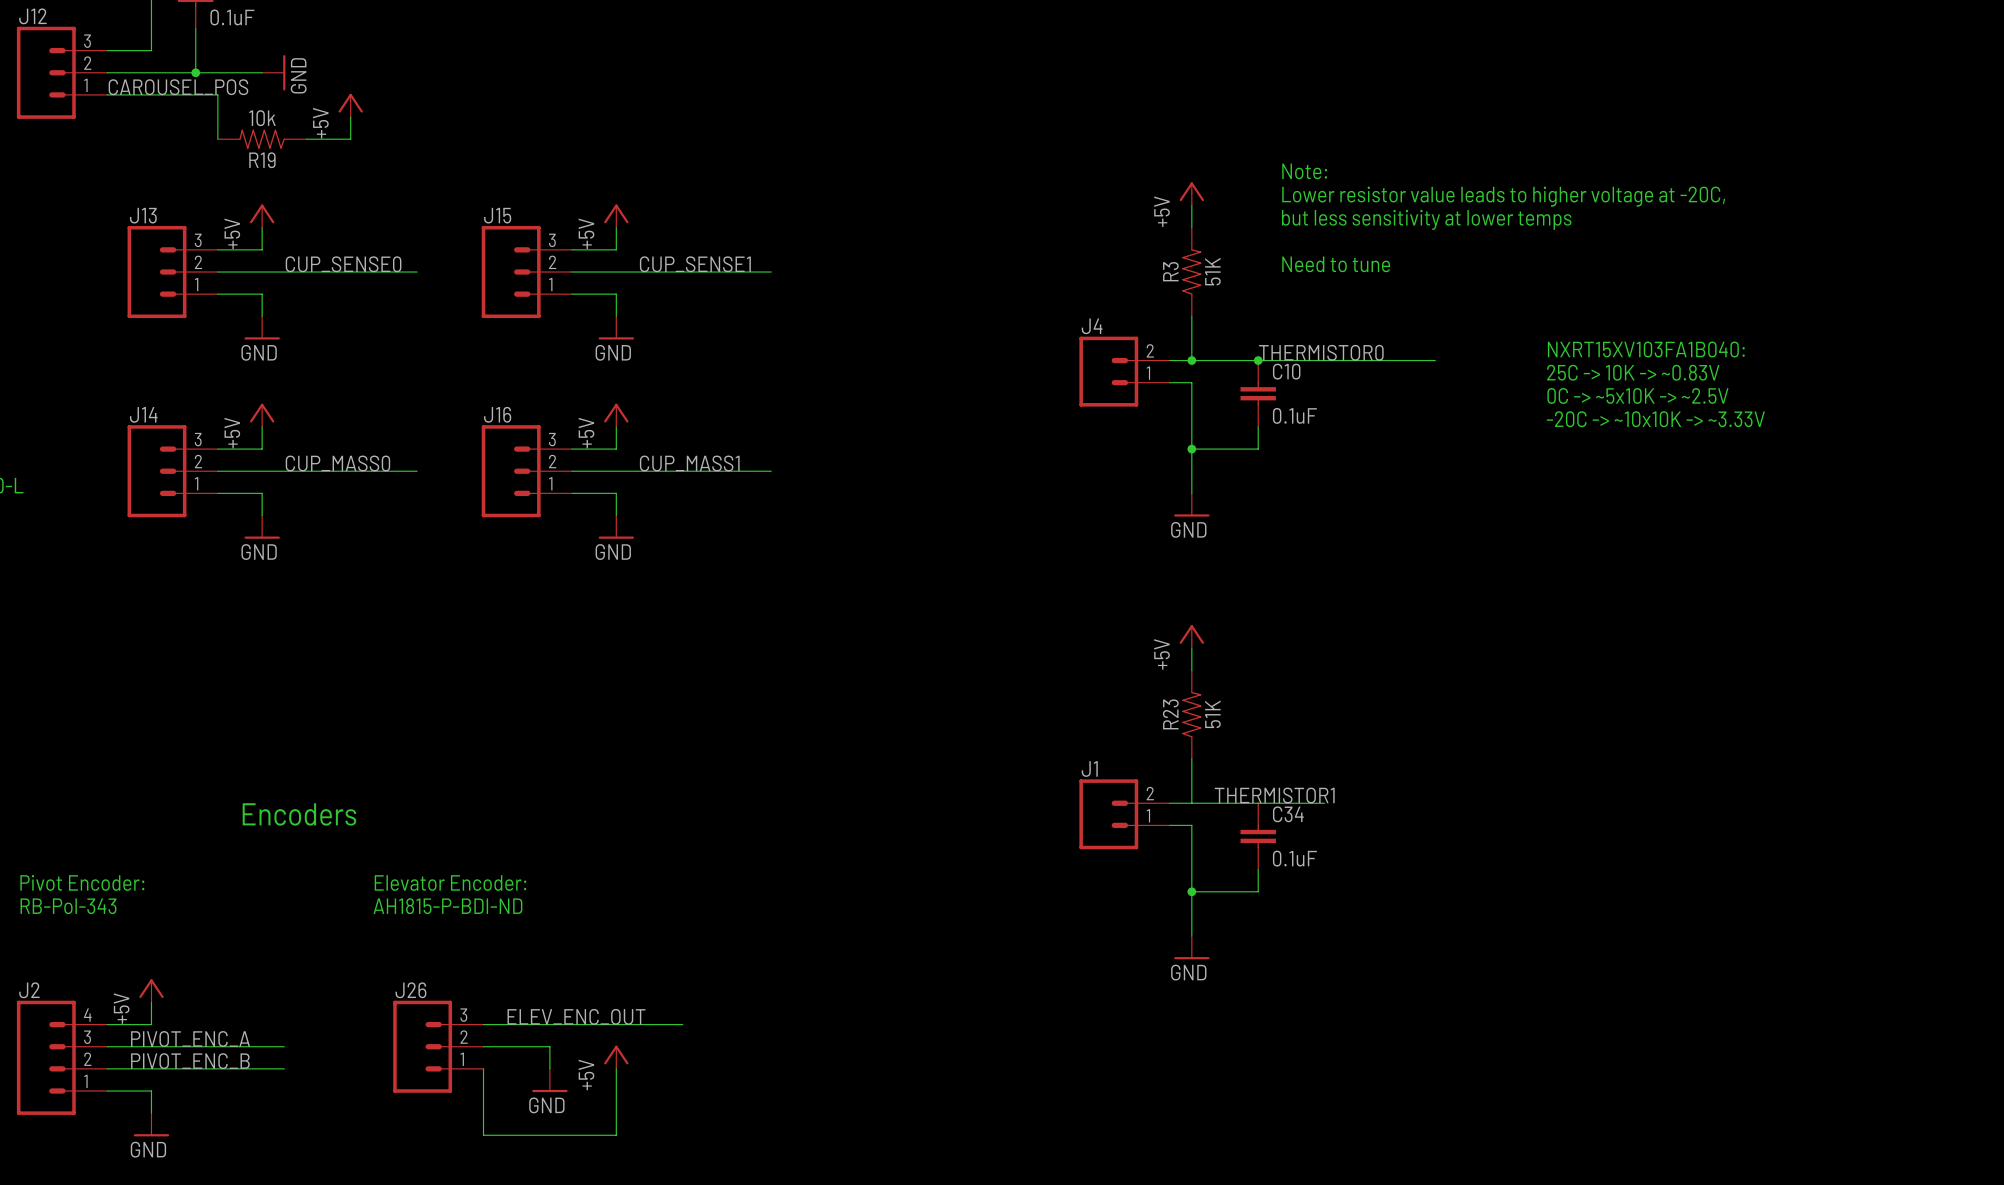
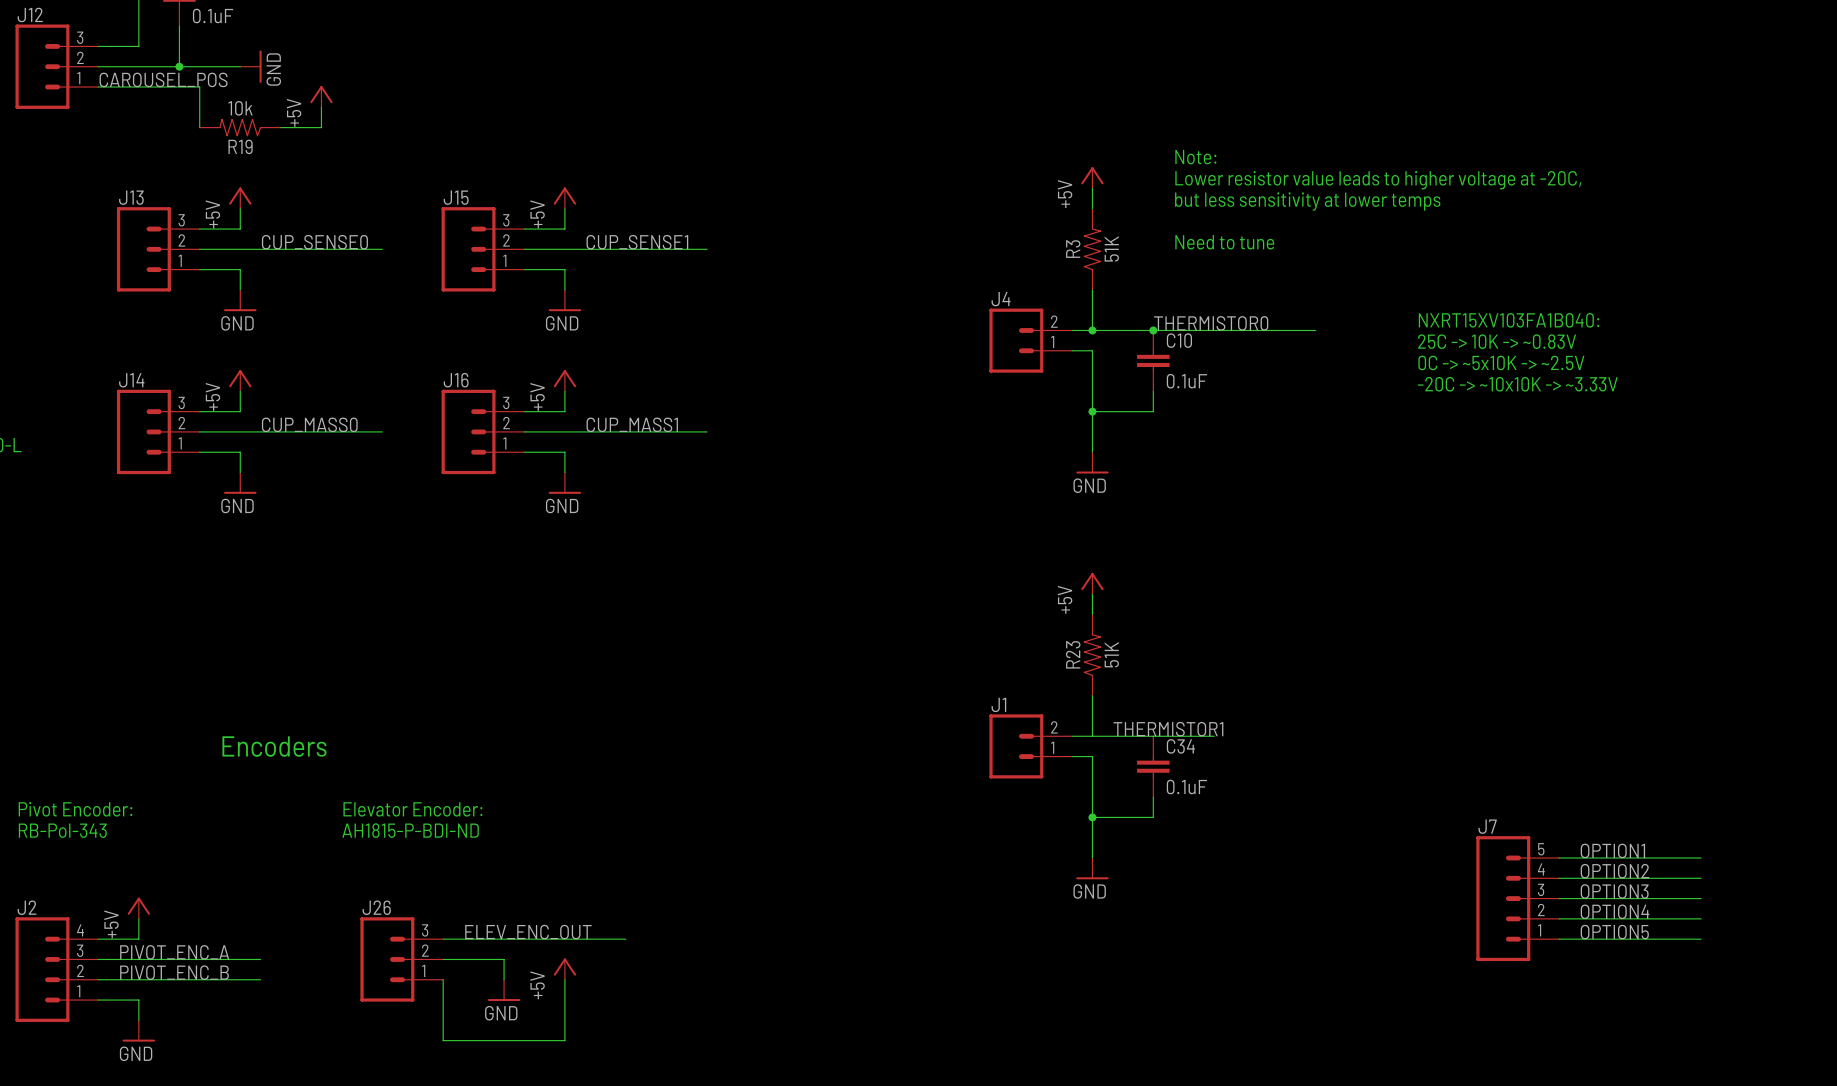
label: none -> OPTION1 (1612, 850)
wire: none -> (1559, 858) (1701, 858)
label: none -> OPTION2 (1614, 871)
wire: none -> (1559, 878) (1701, 878)
label: none -> OPTION3 (1614, 891)
J7: none -> (1517, 898)
wire: none -> (1559, 898) (1701, 898)
label: none -> OPTION4 (1615, 911)
wire: none -> (1559, 918) (1701, 918)
label: none -> OPTION5 (1614, 932)
wire: none -> (1559, 939) (1701, 939)

